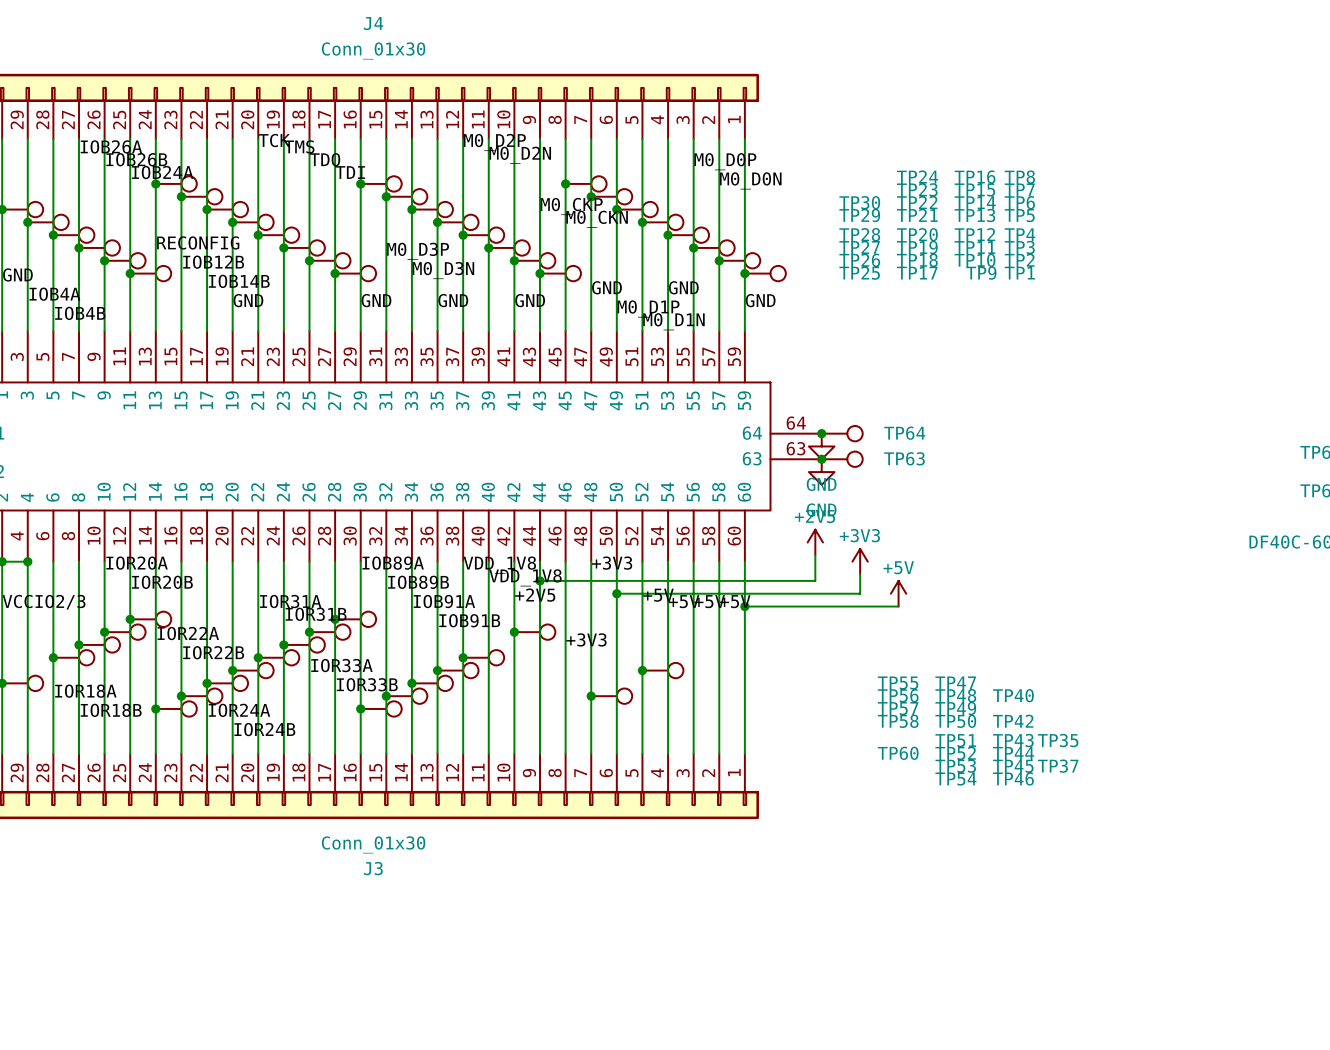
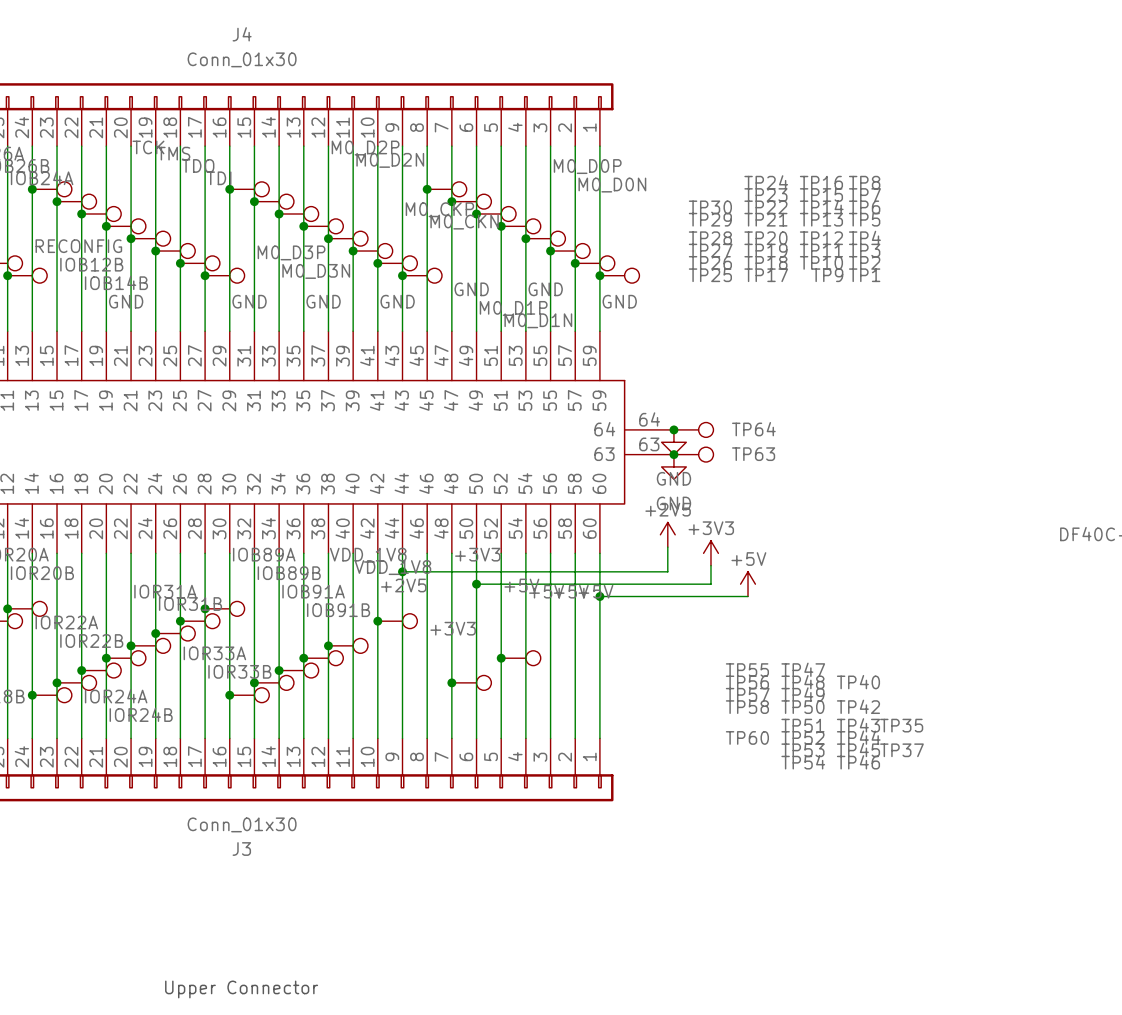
text: none -> Upper Connector (241, 989)

